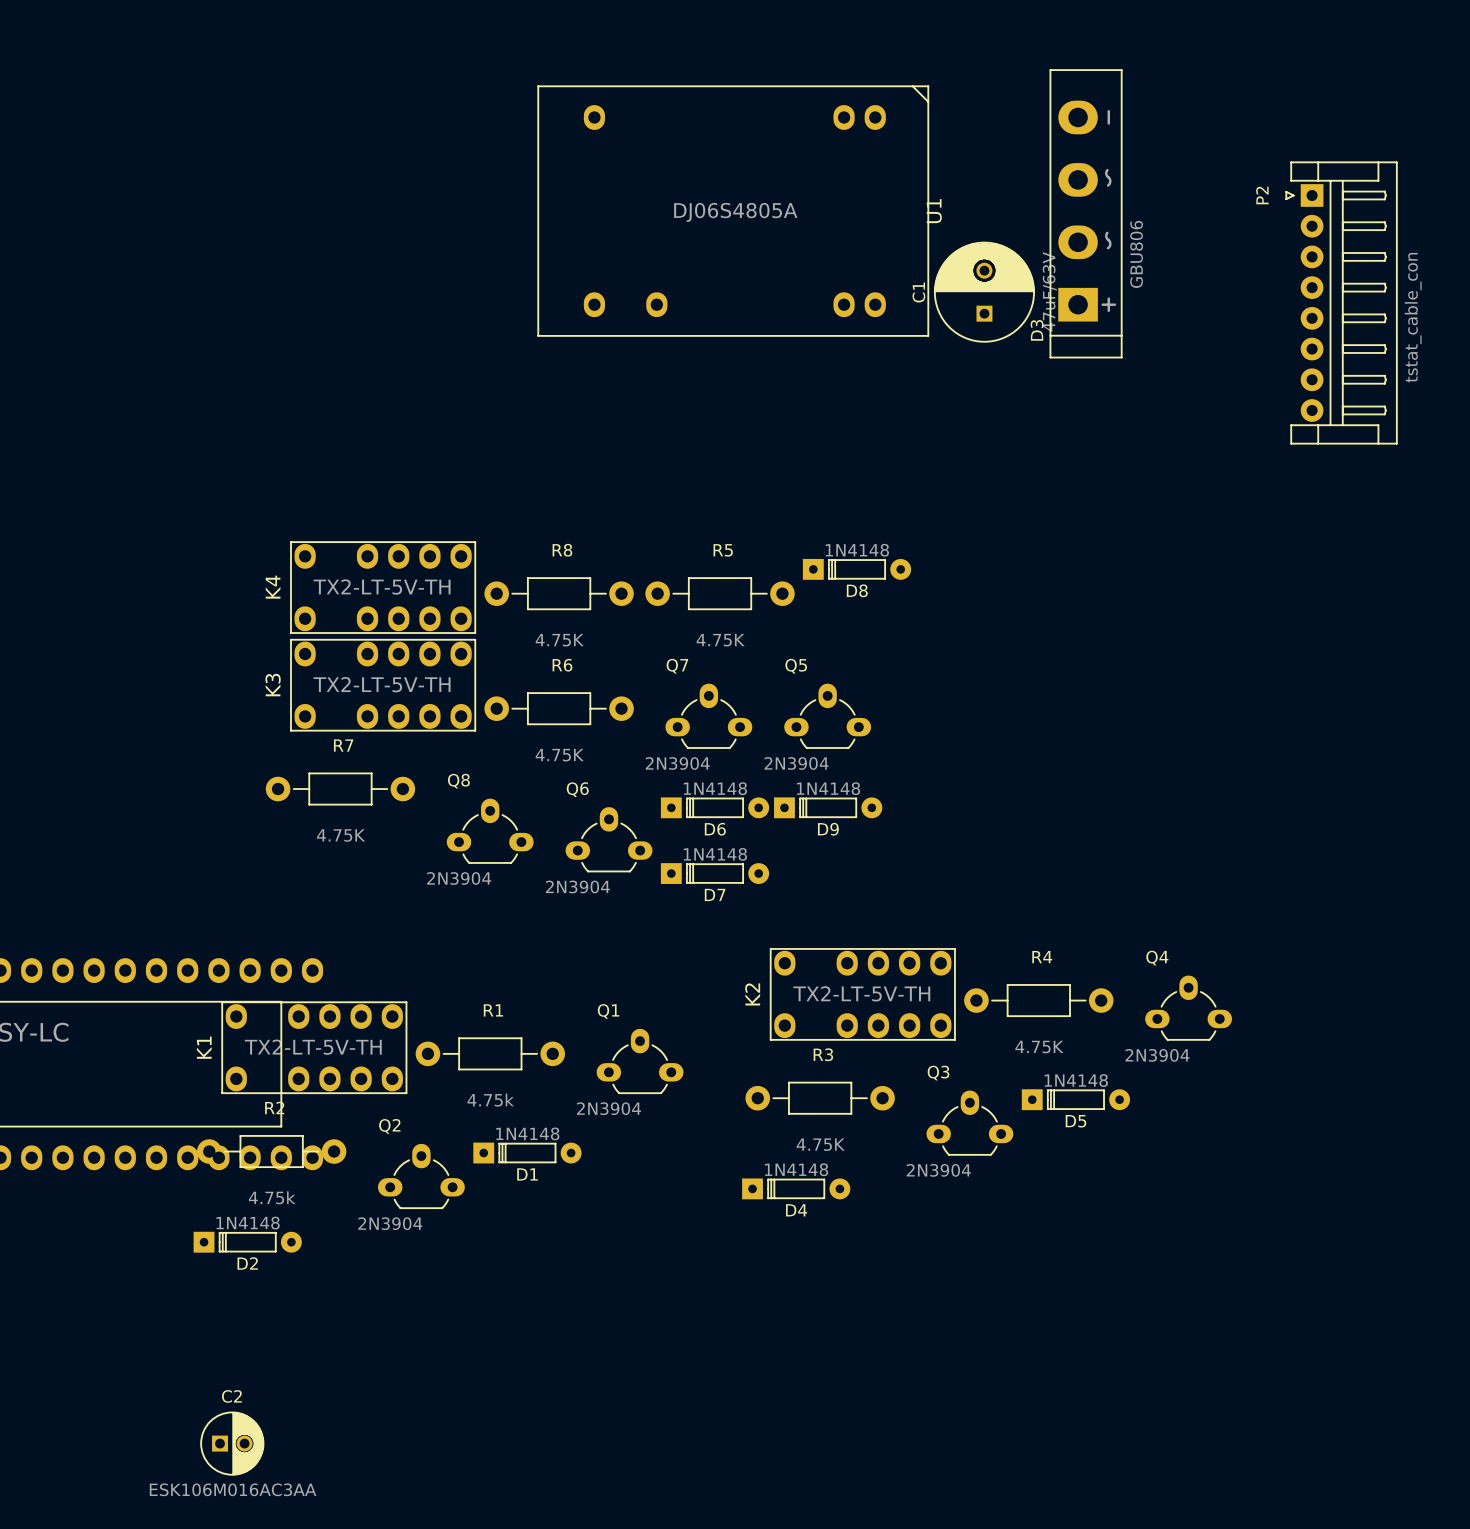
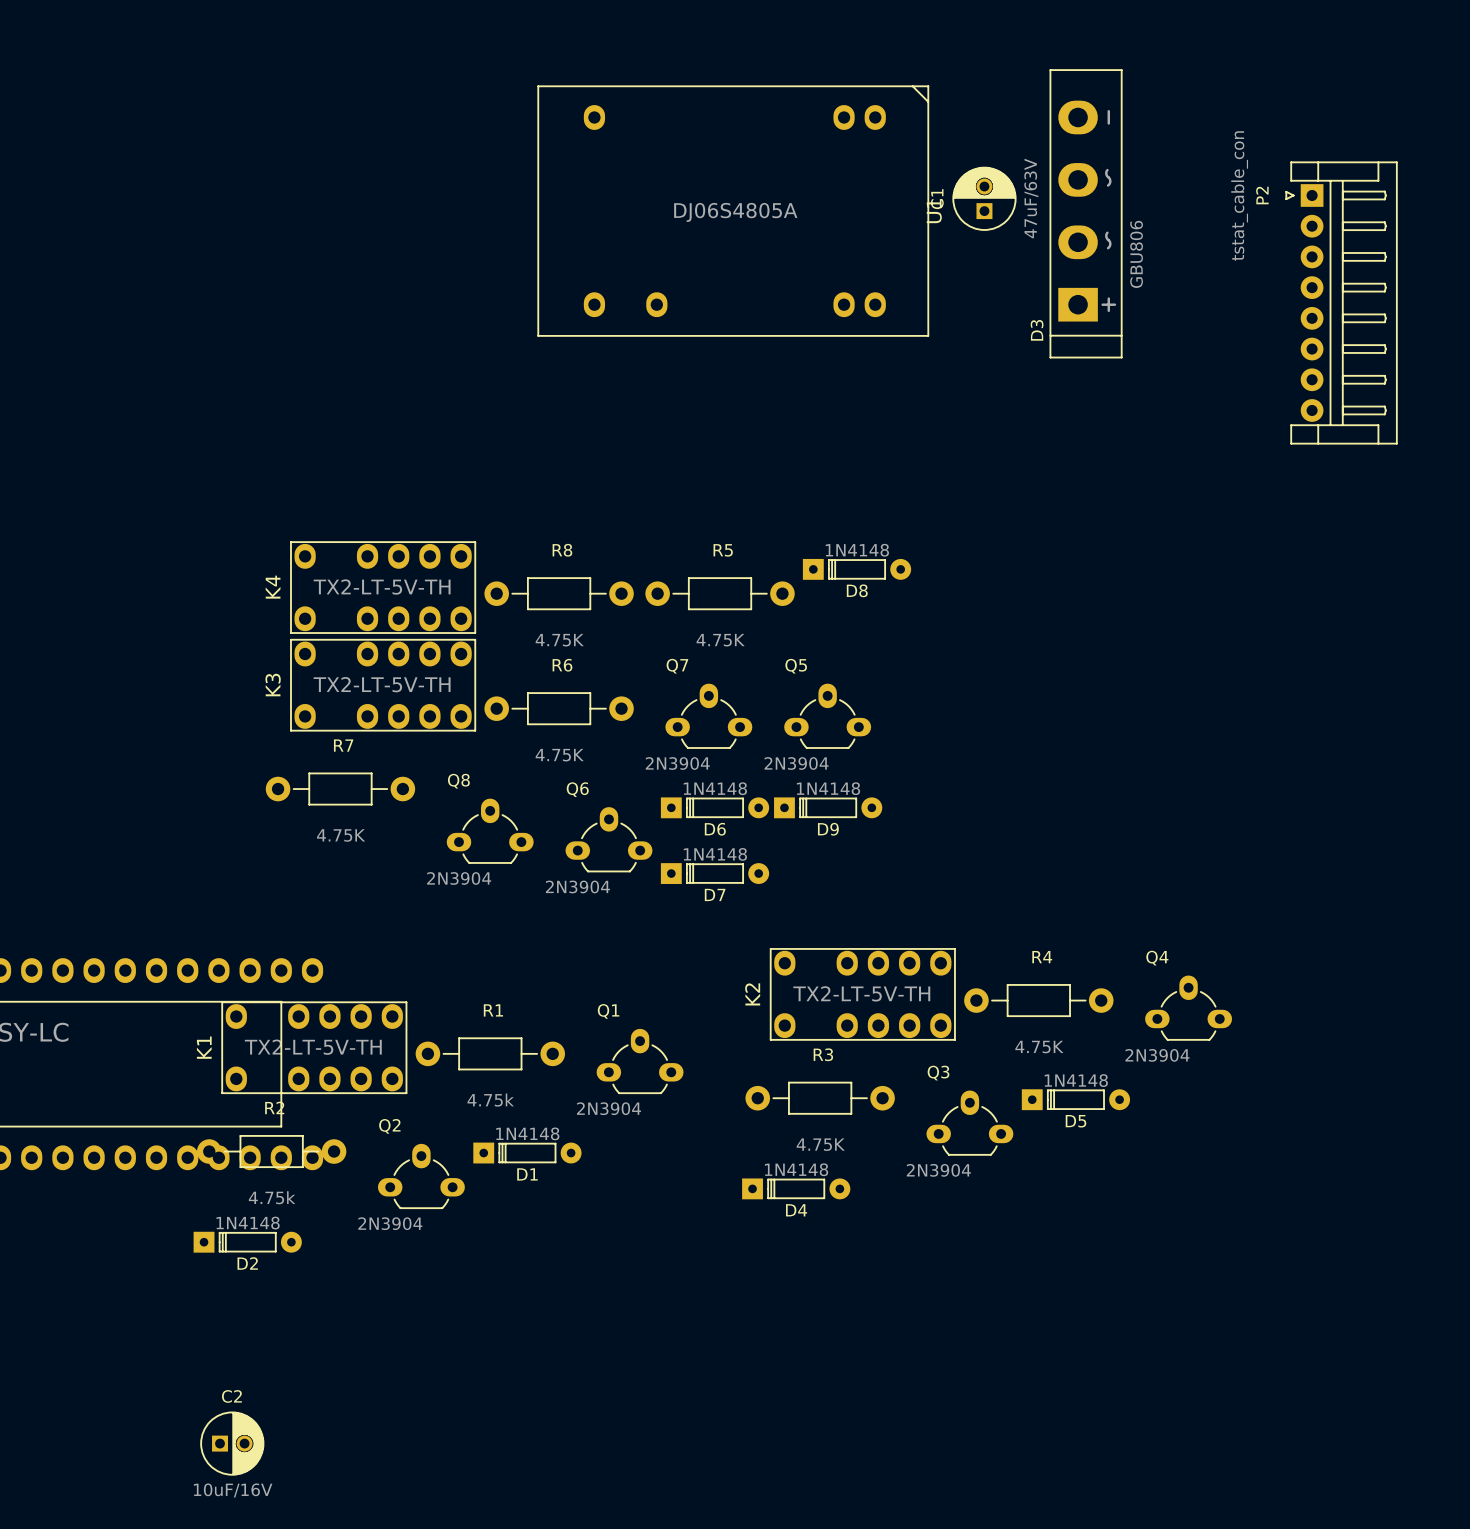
C1 footprint: [933, 241, 1035, 343] -> [952, 166, 1017, 231]
P2 value position: tstat_cable_con (1413, 317) -> tstat_cable_con (1239, 195)
C2 value: ESK106M016AC3AA (233, 1489) -> 10uF/16V (233, 1490)

